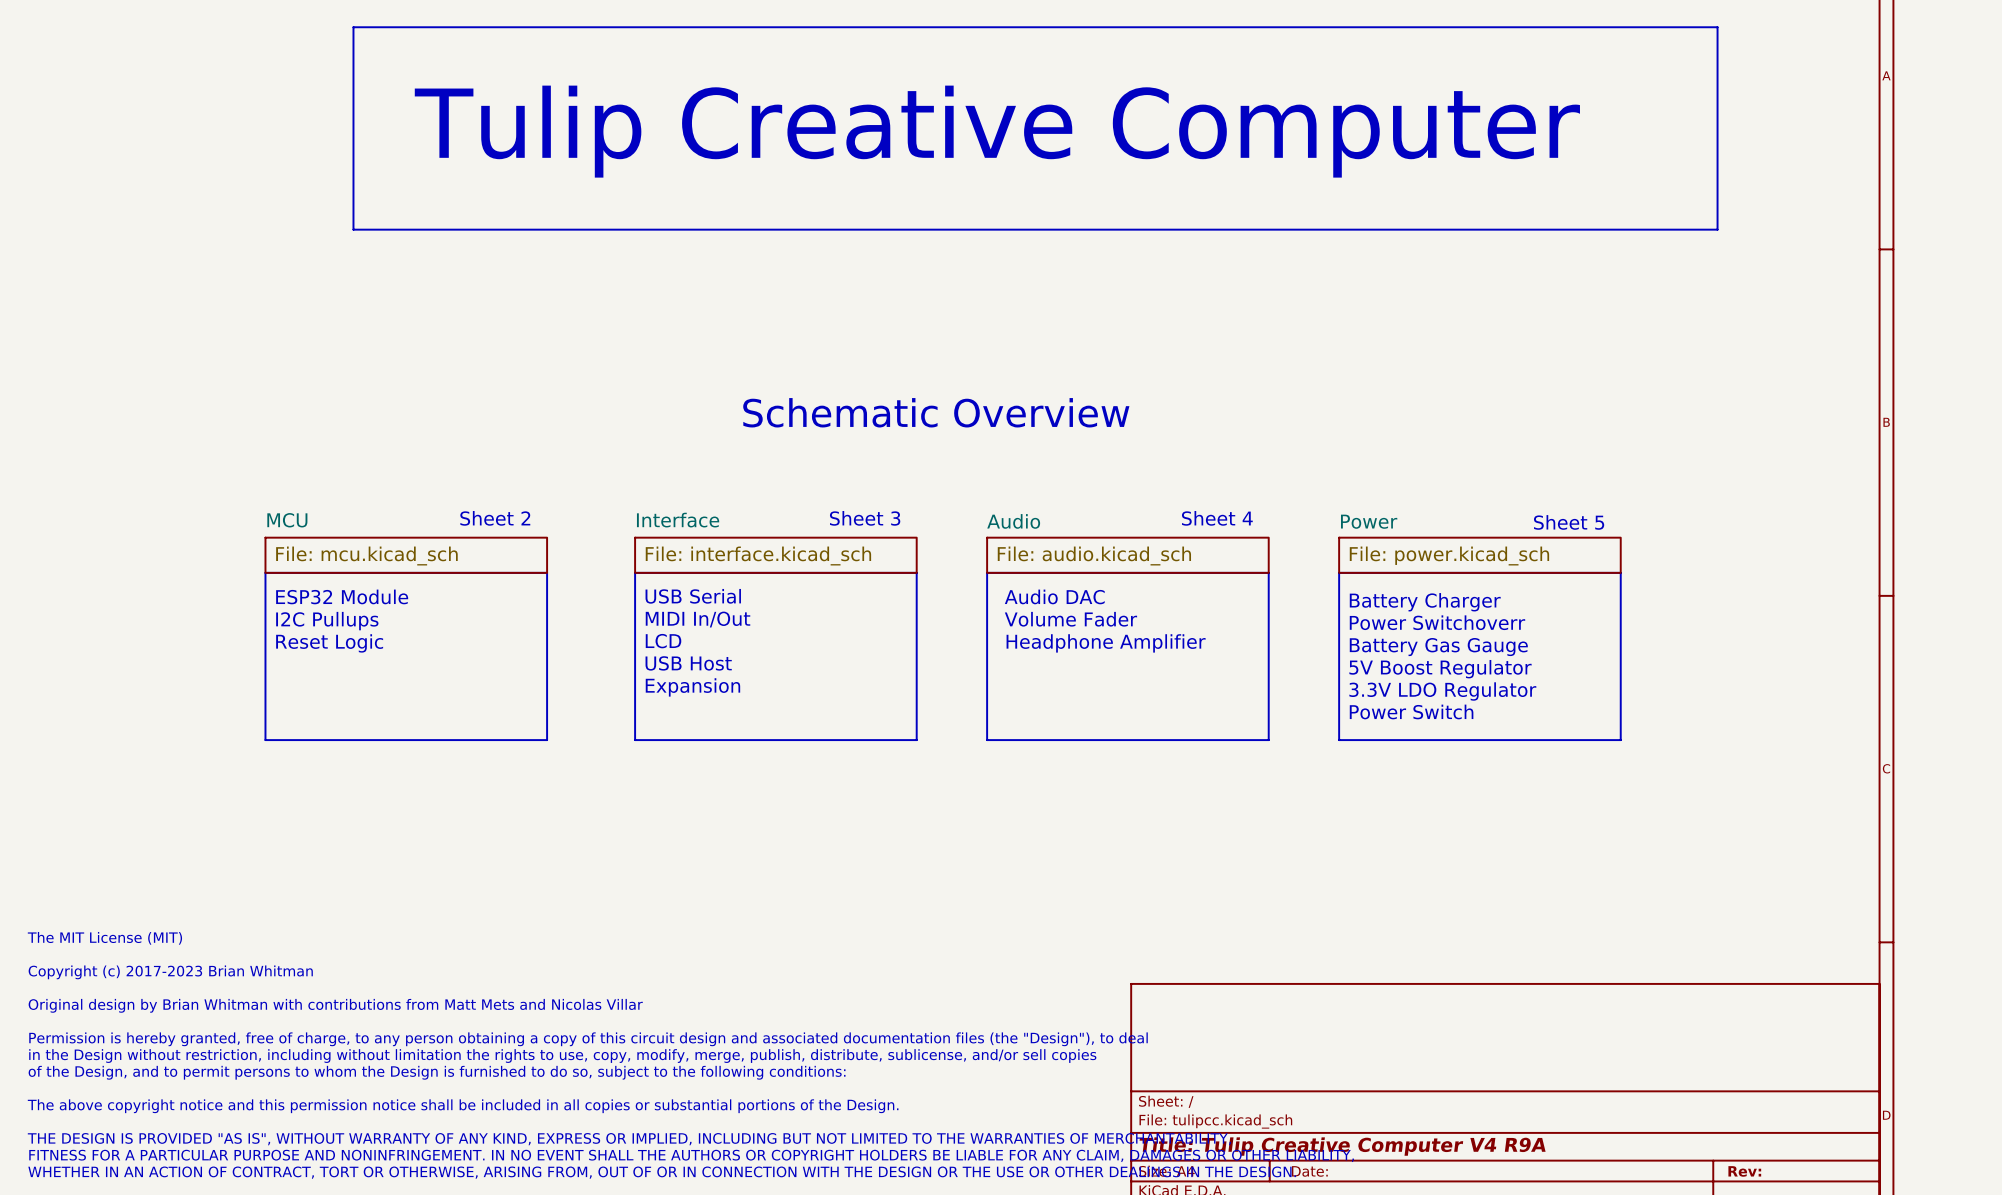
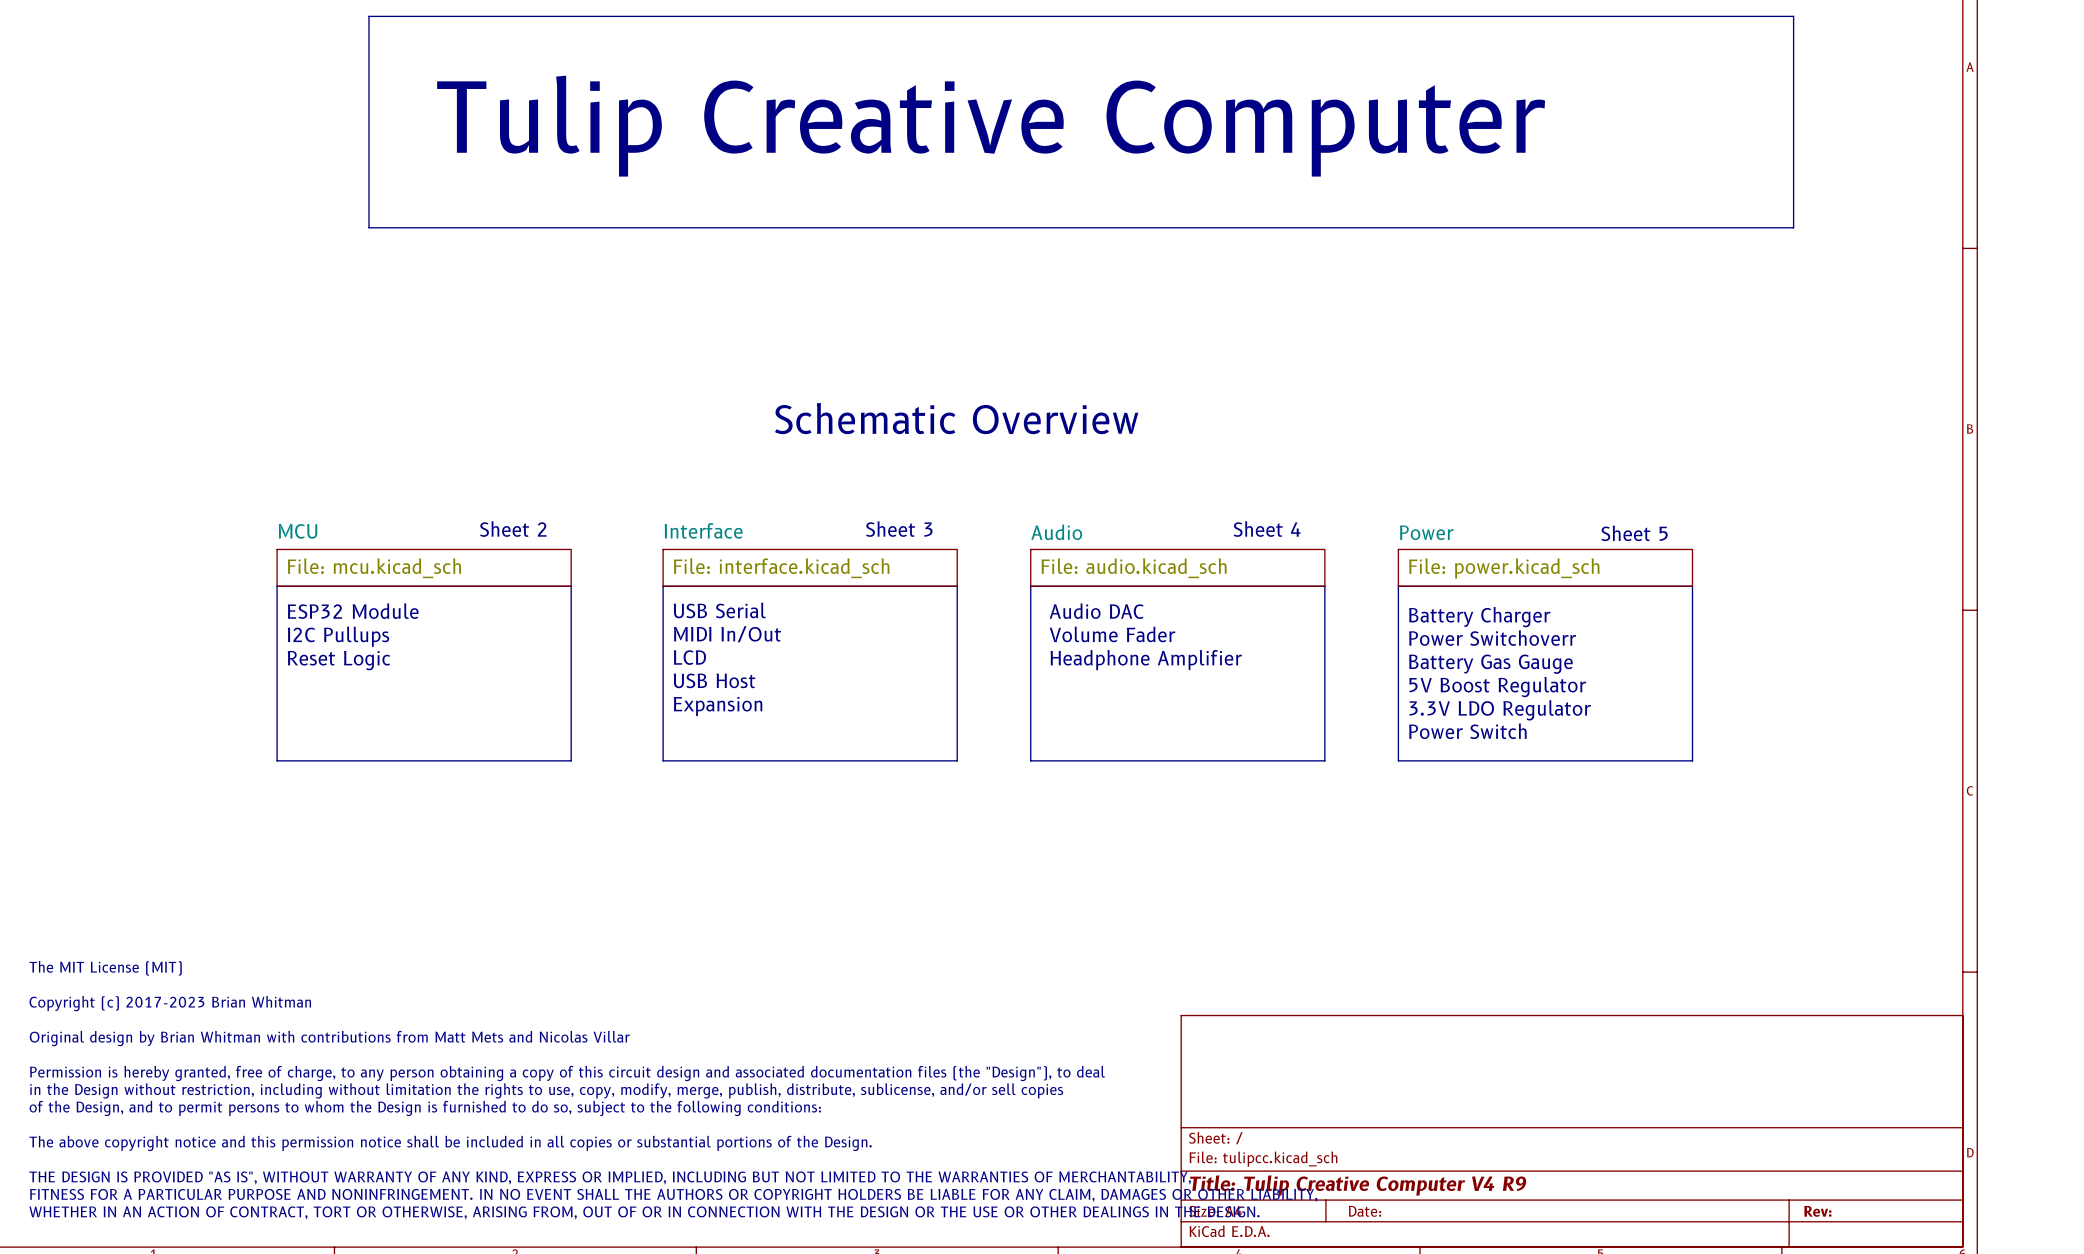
title block: Title: Tulip Creative Computer V4 R9A (1342, 1146) -> Title: Tulip Creative Computer V4 R9 (1358, 1185)

